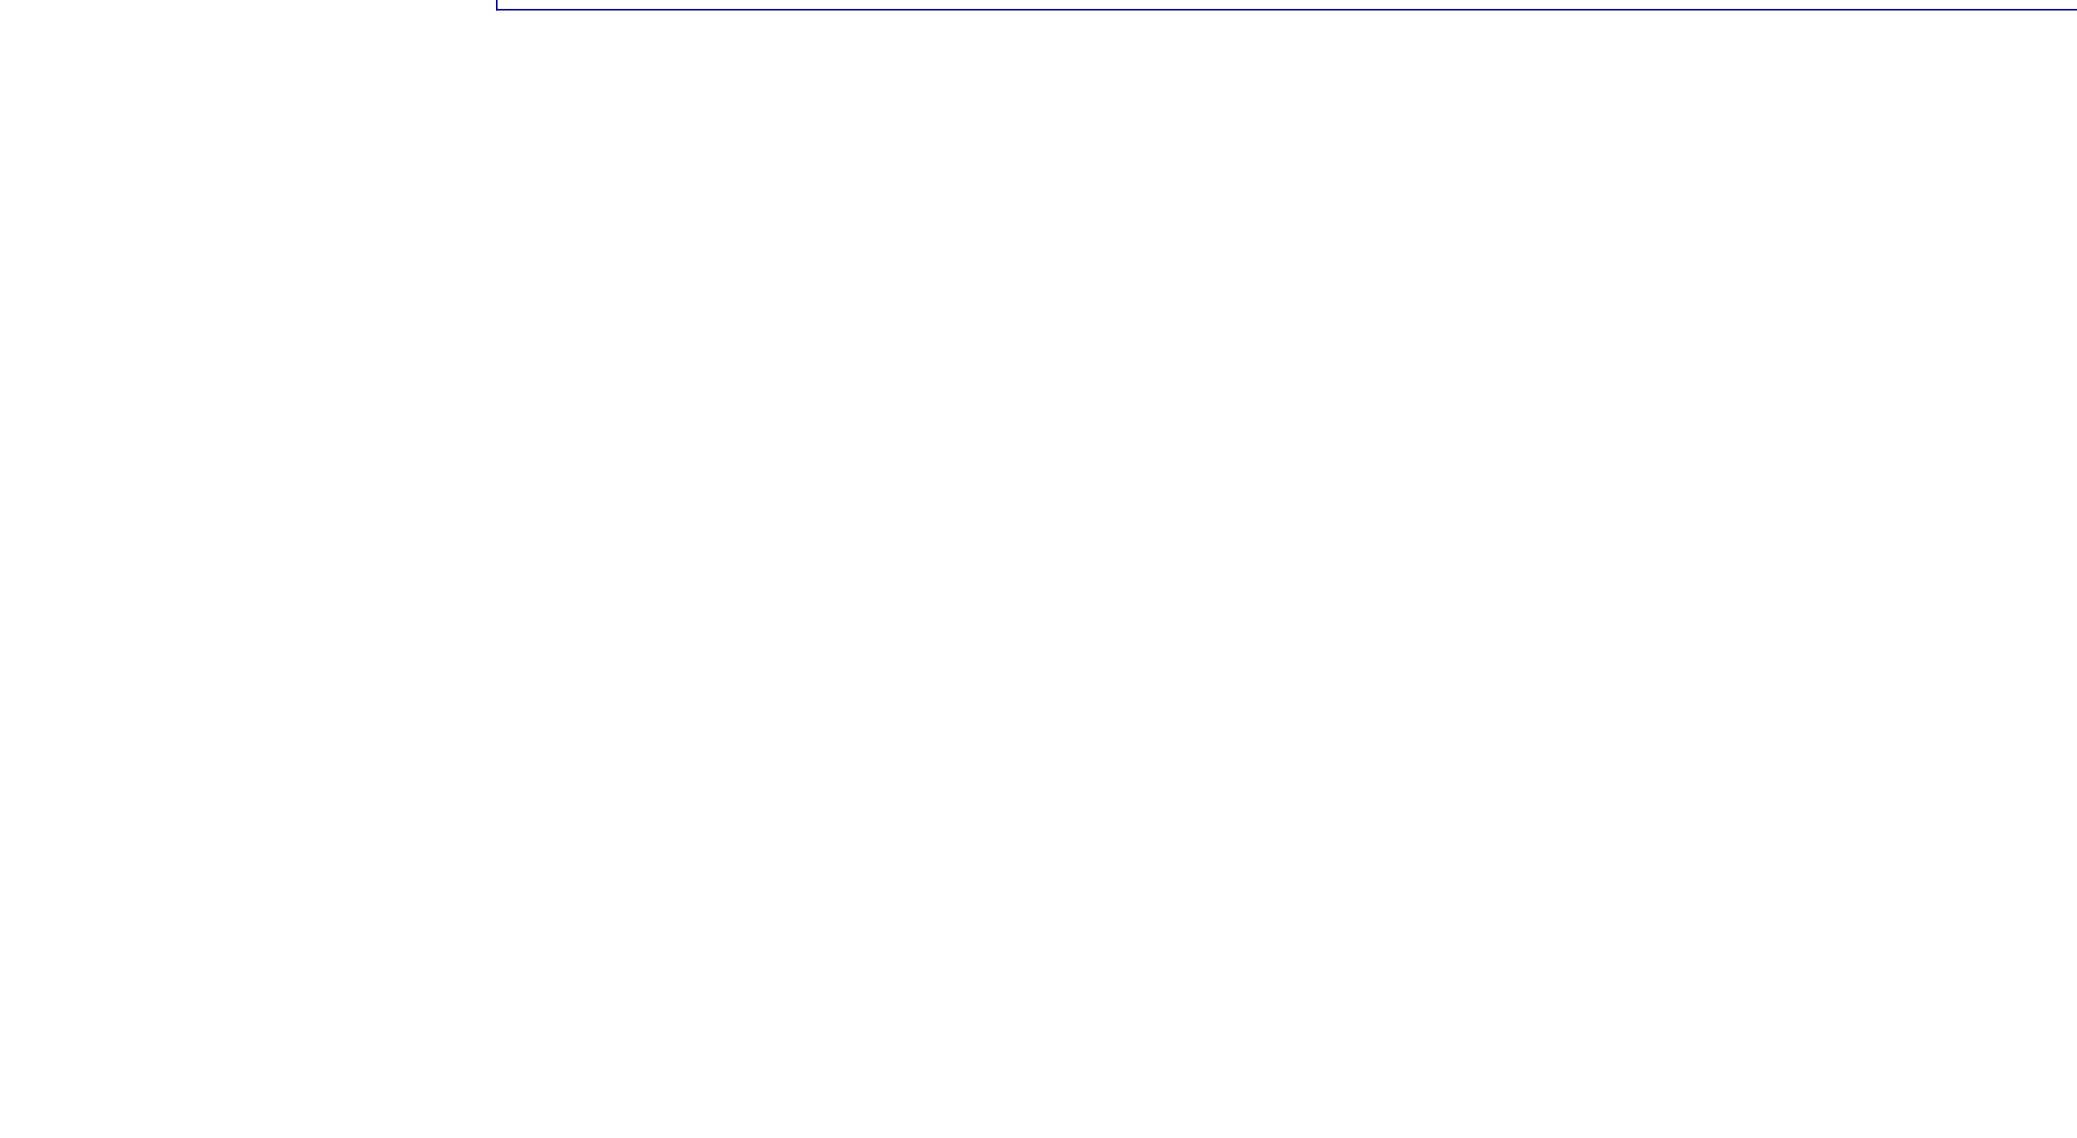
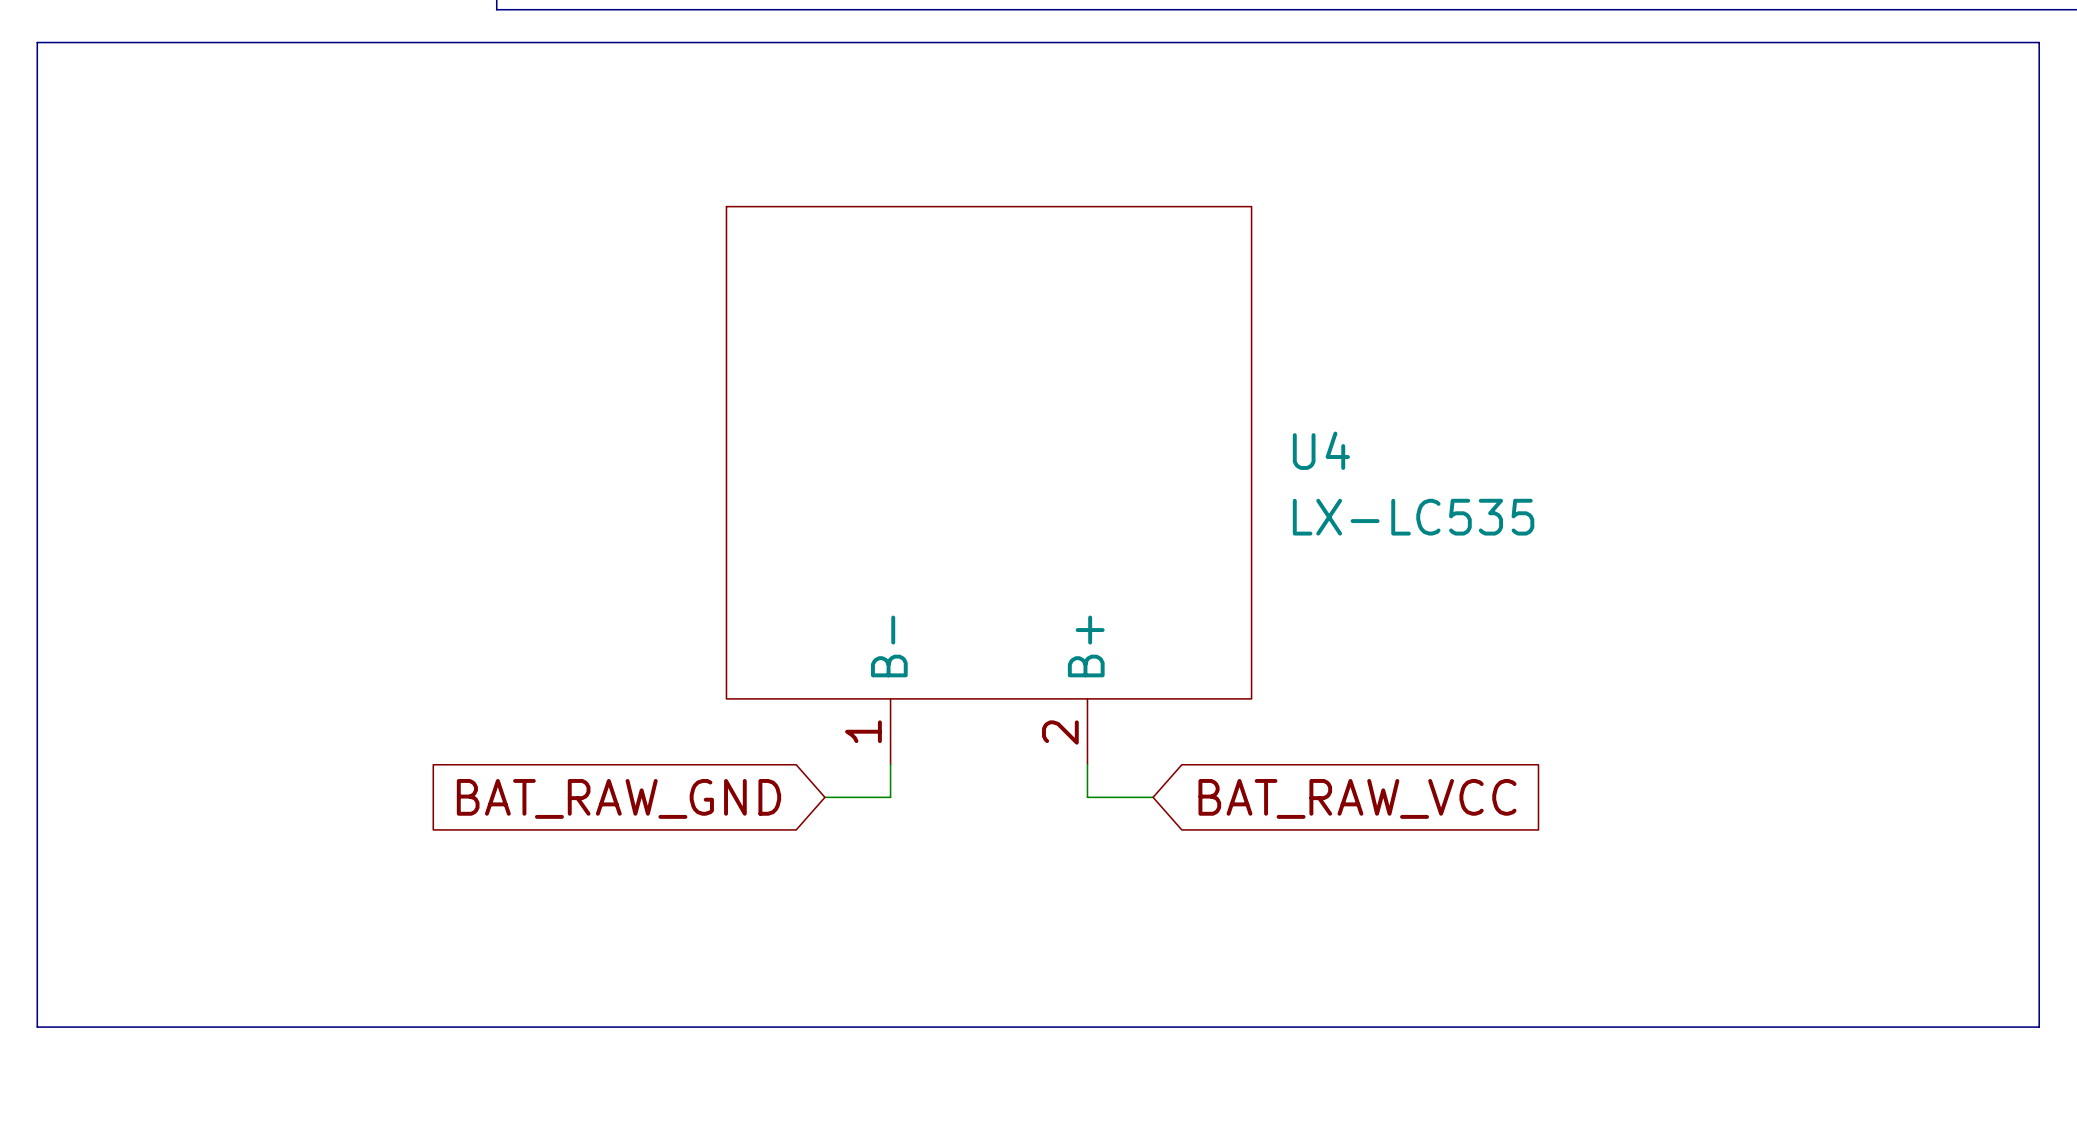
line: none -> (37, 42) (2039, 42) (2039, 1027) (37, 1027) (37, 42)
U4: none -> LX-LC535 (989, 485)
wire: none -> (890, 764) (890, 797) (824, 797)
wire: none -> (1087, 764) (1087, 797) (1153, 797)
global label: none -> BAT_RAW_GND (618, 798)
global label: none -> BAT_RAW_VCC (1357, 798)

